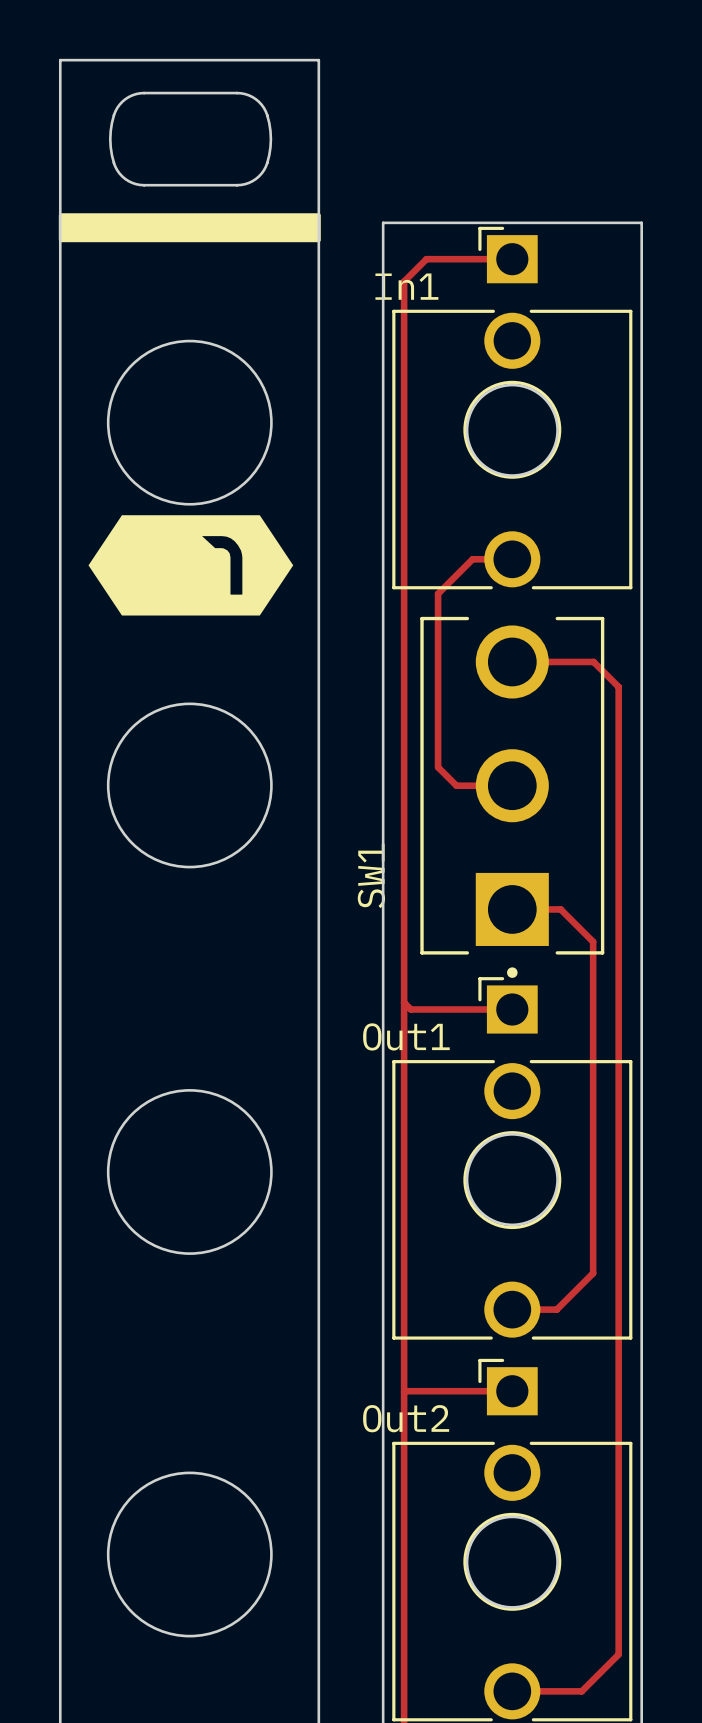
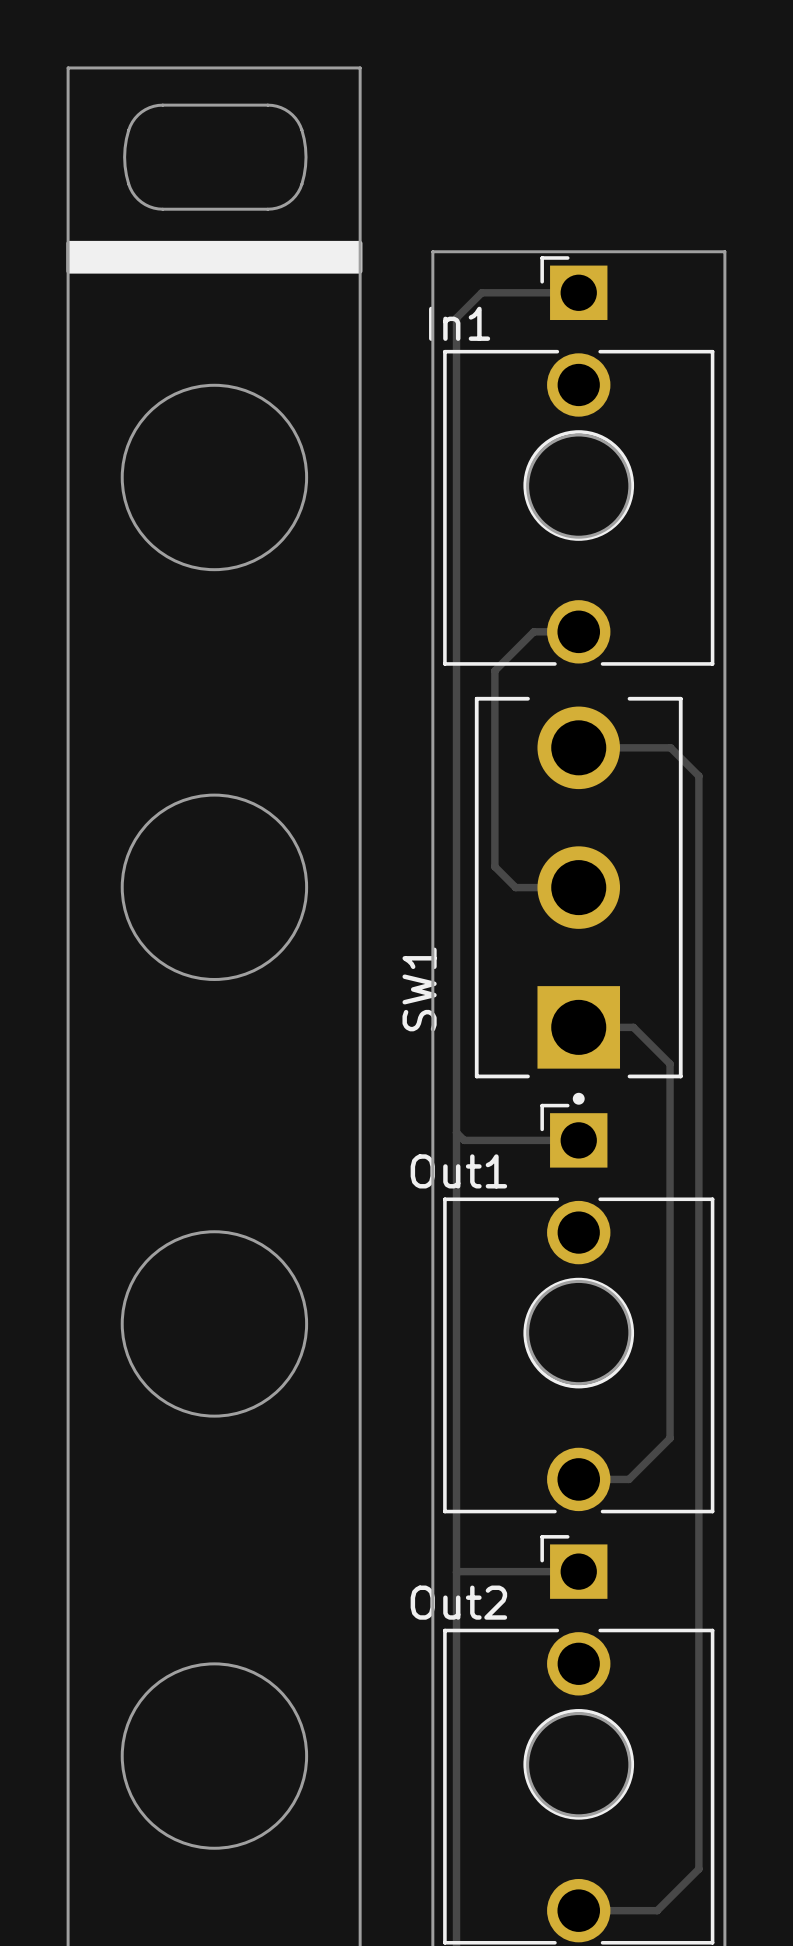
drawing: [88, 515, 294, 616] -> none

